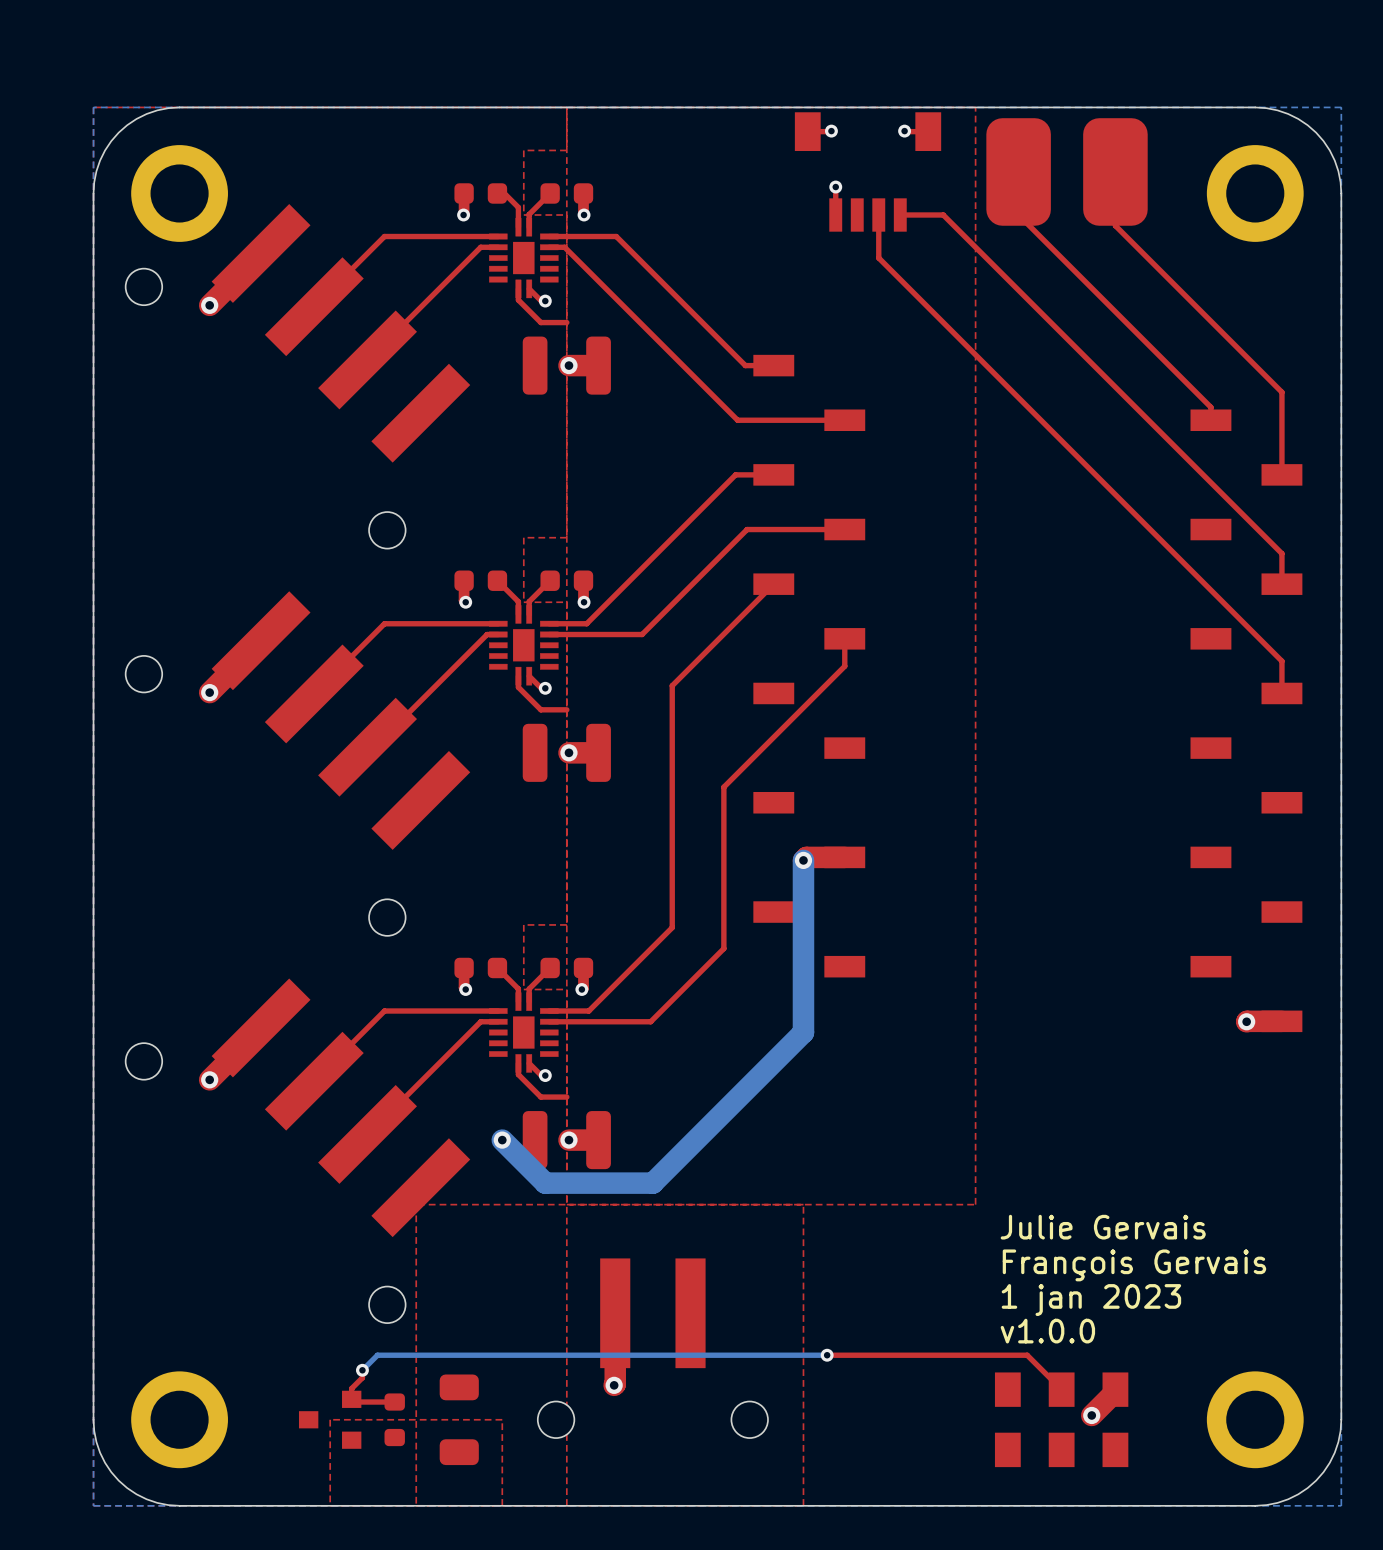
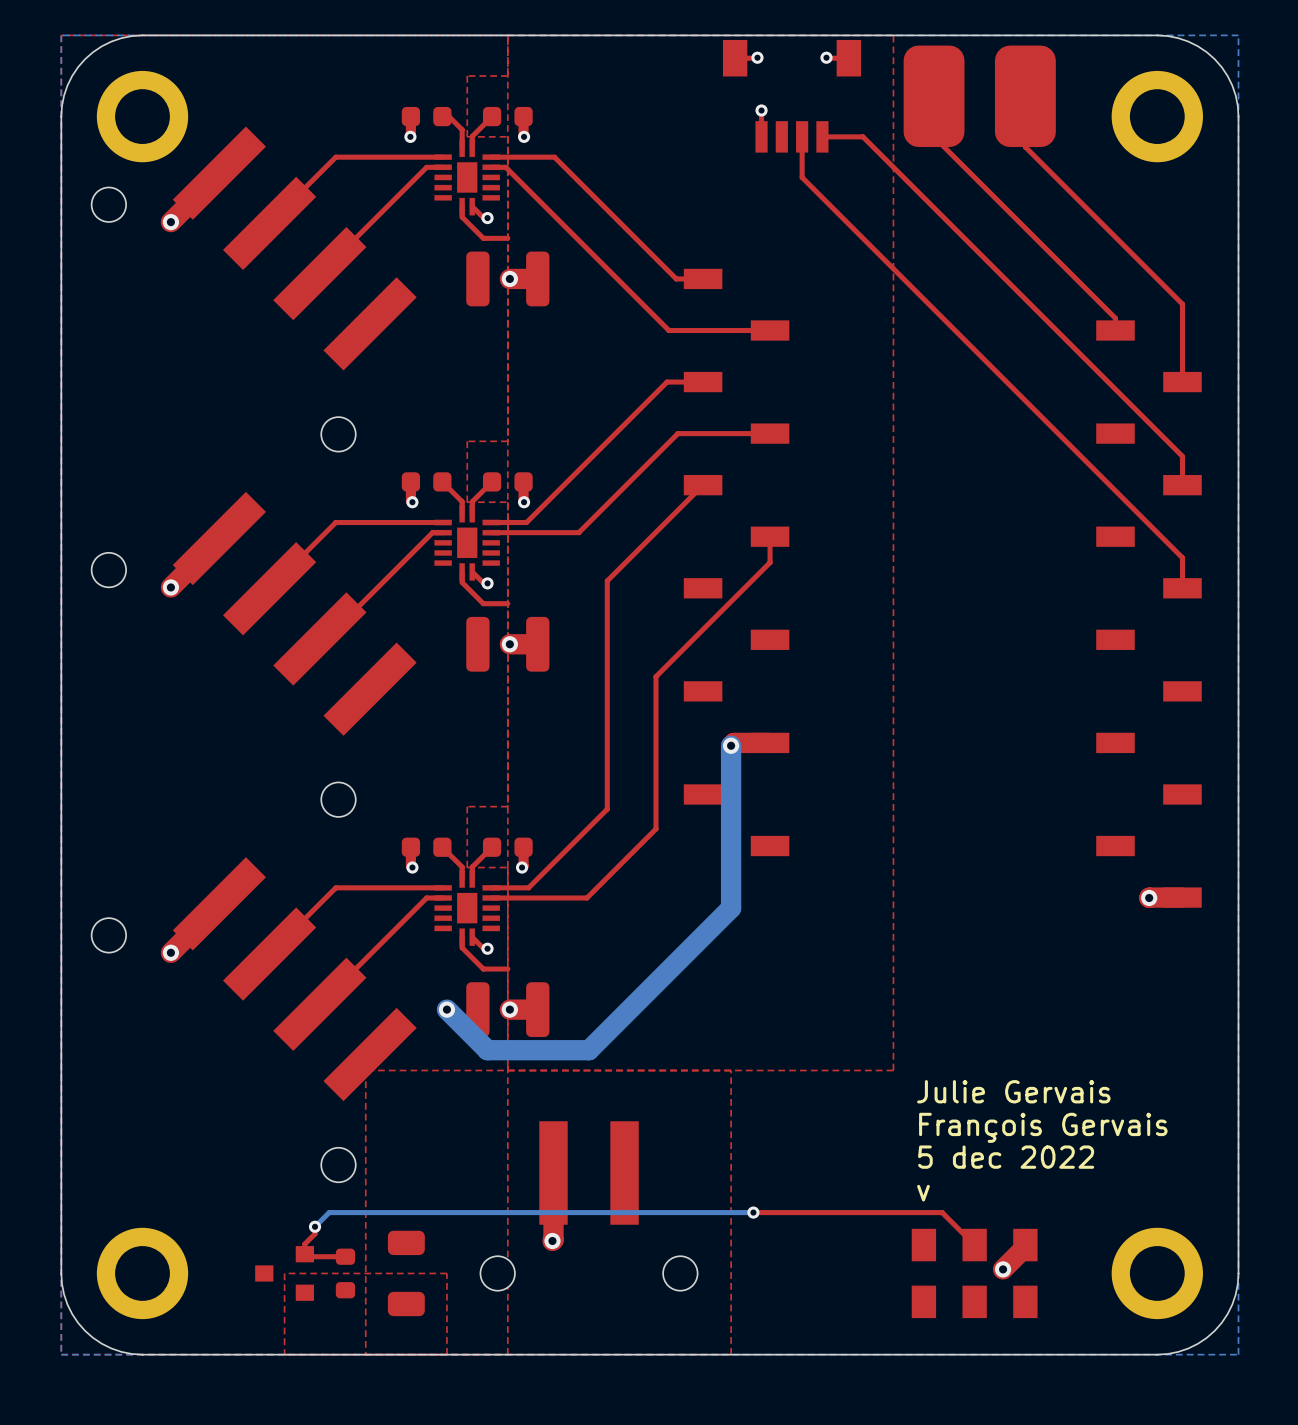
text: 1 jan 2023 (1091, 1300) -> 5 dec 2022 (1006, 1157)
text: v1.0.0 (1047, 1331) -> v (923, 1193)

